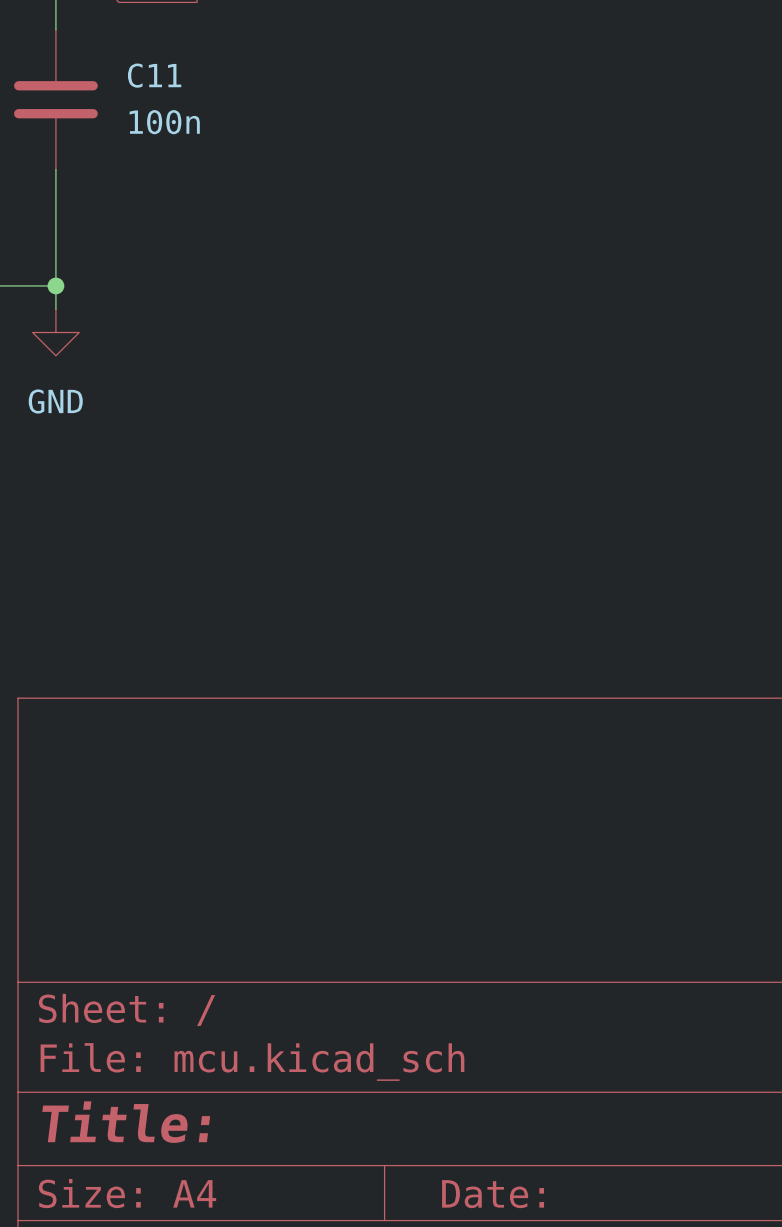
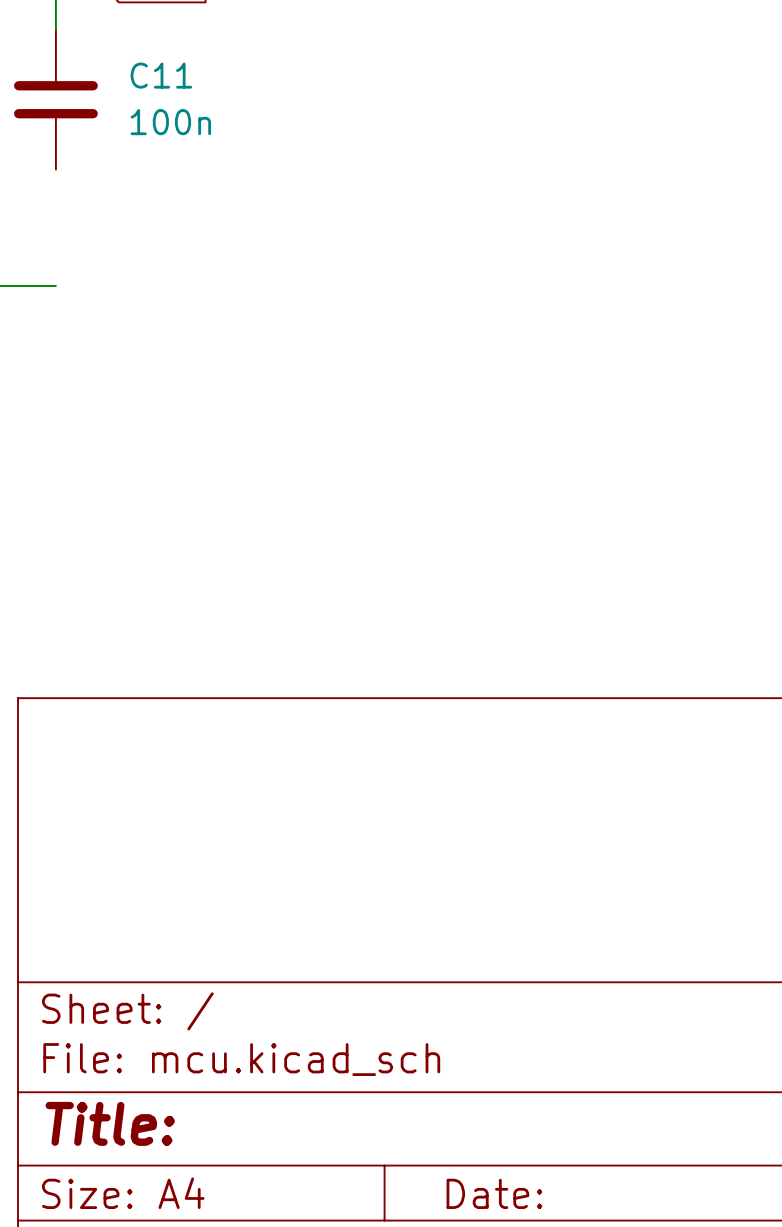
wire: (55, 169) (55, 309) -> none
junction: (55, 285) -> none
power symbol: GND (55, 332) -> none

